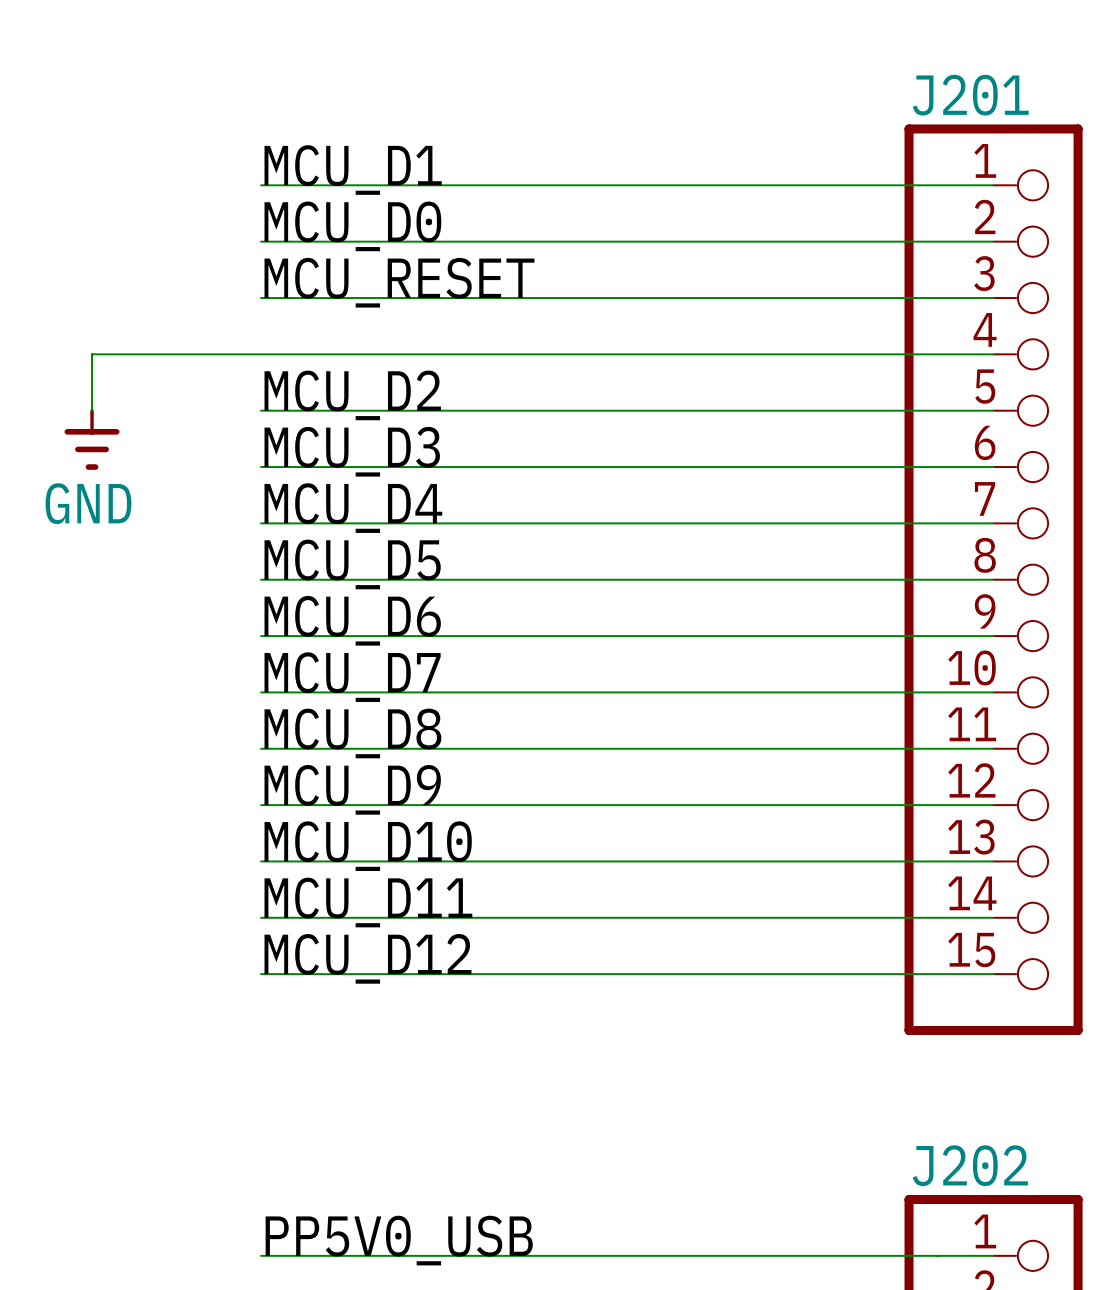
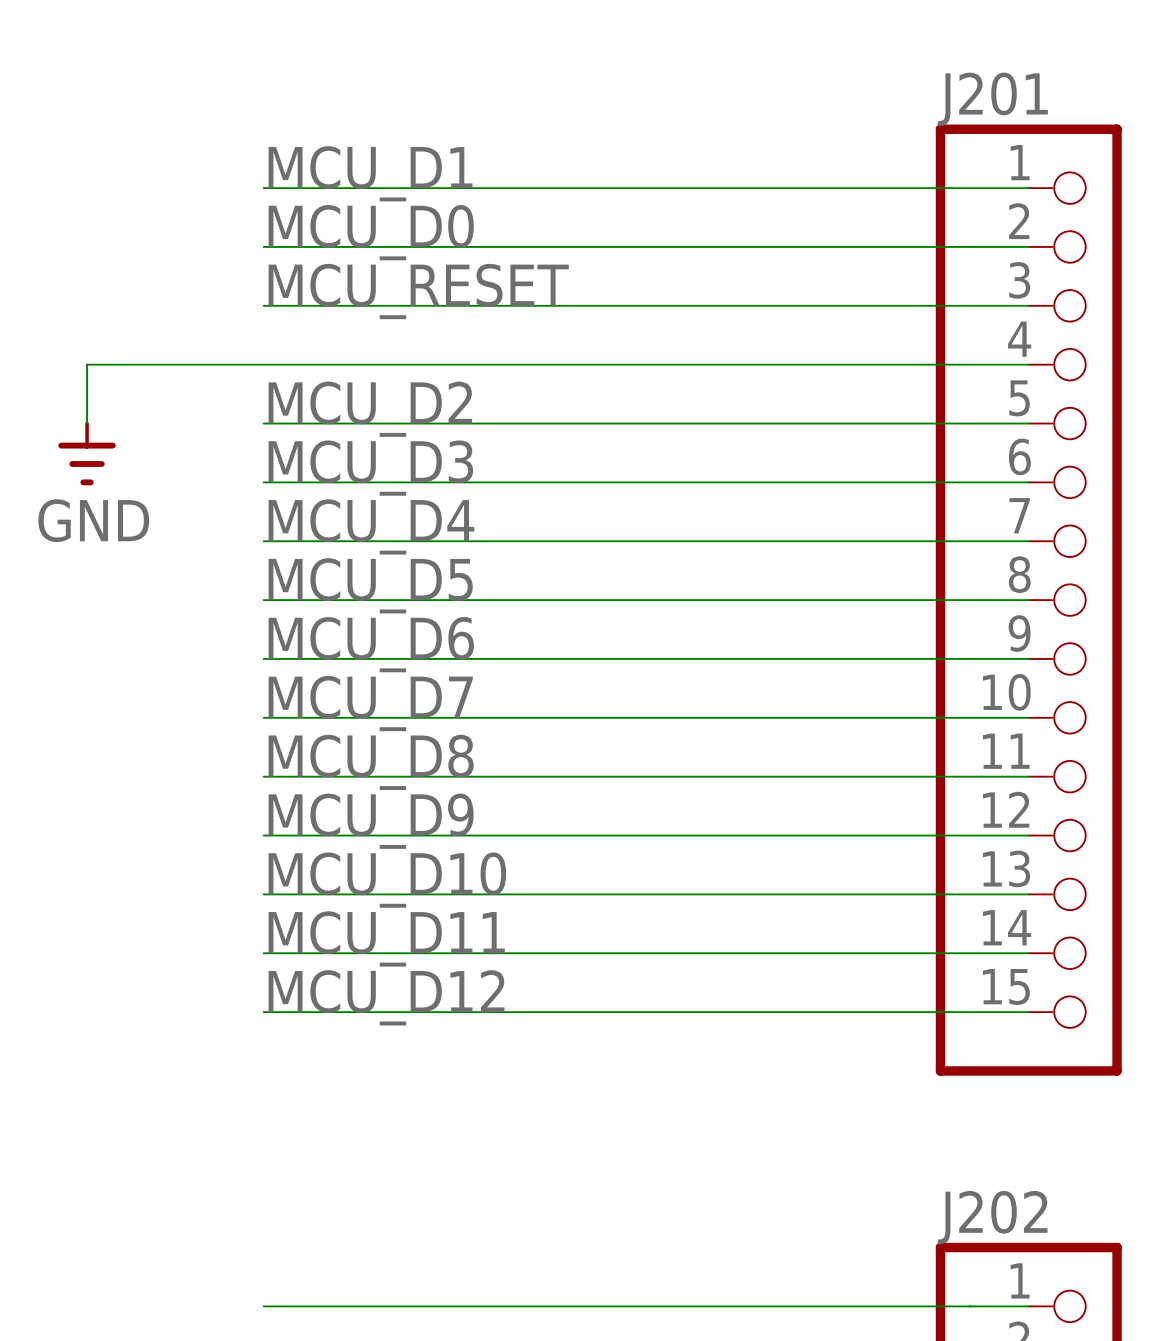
label: PP5V0_USB (399, 1240) -> none

